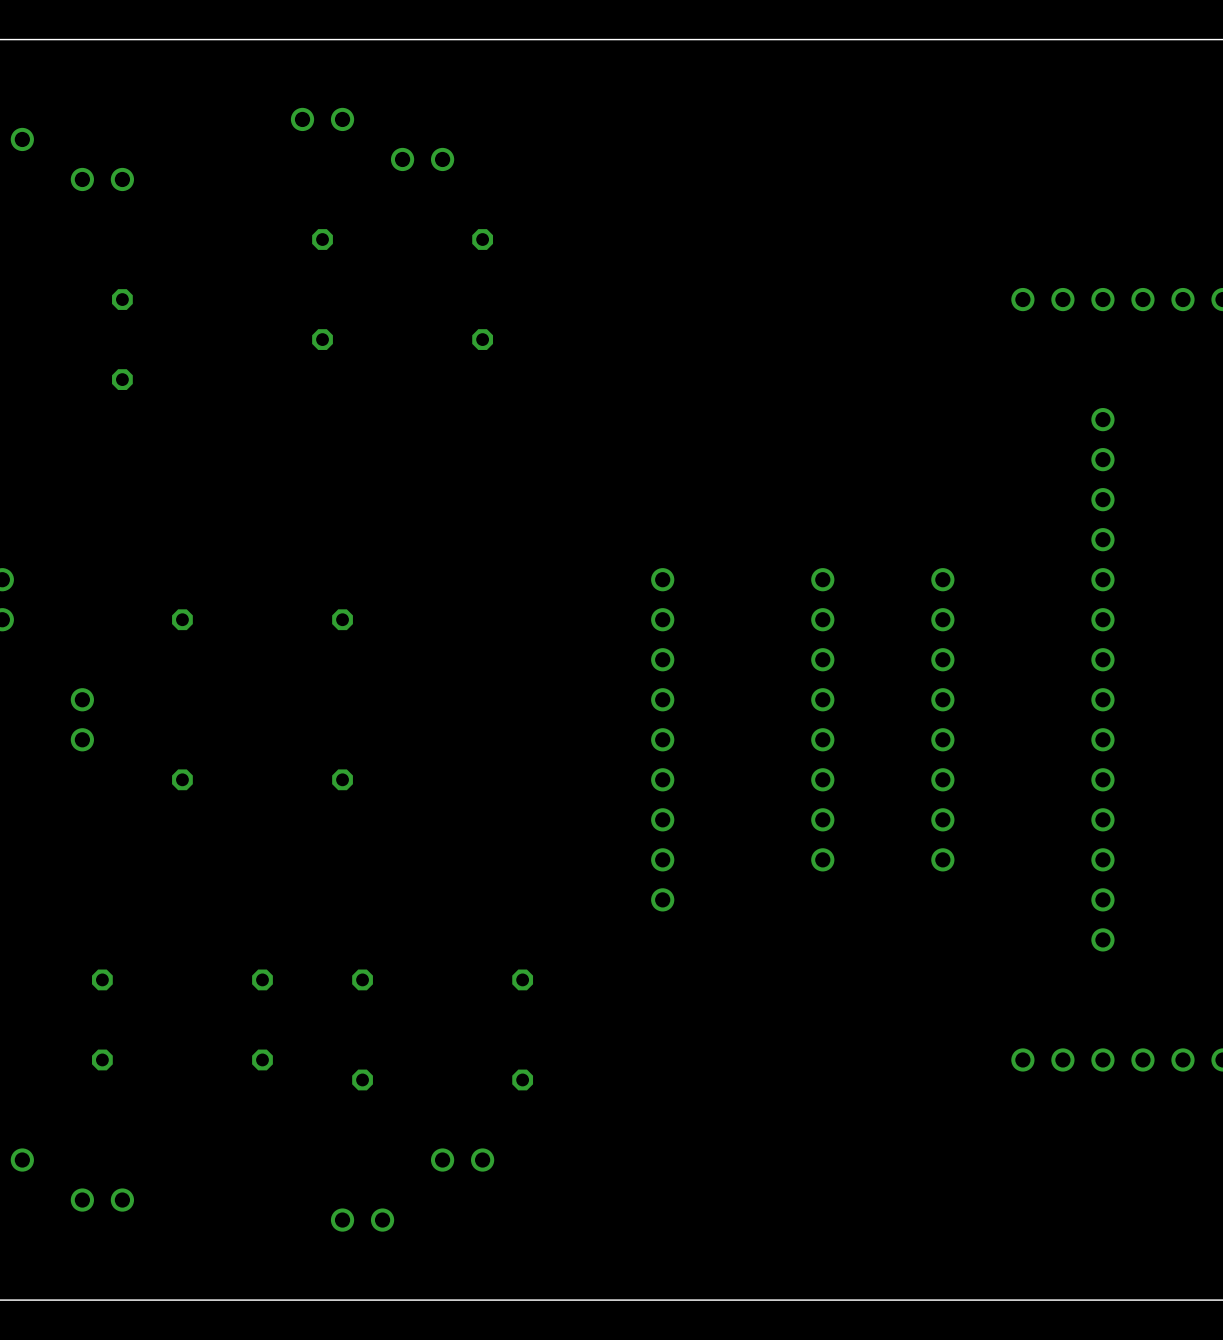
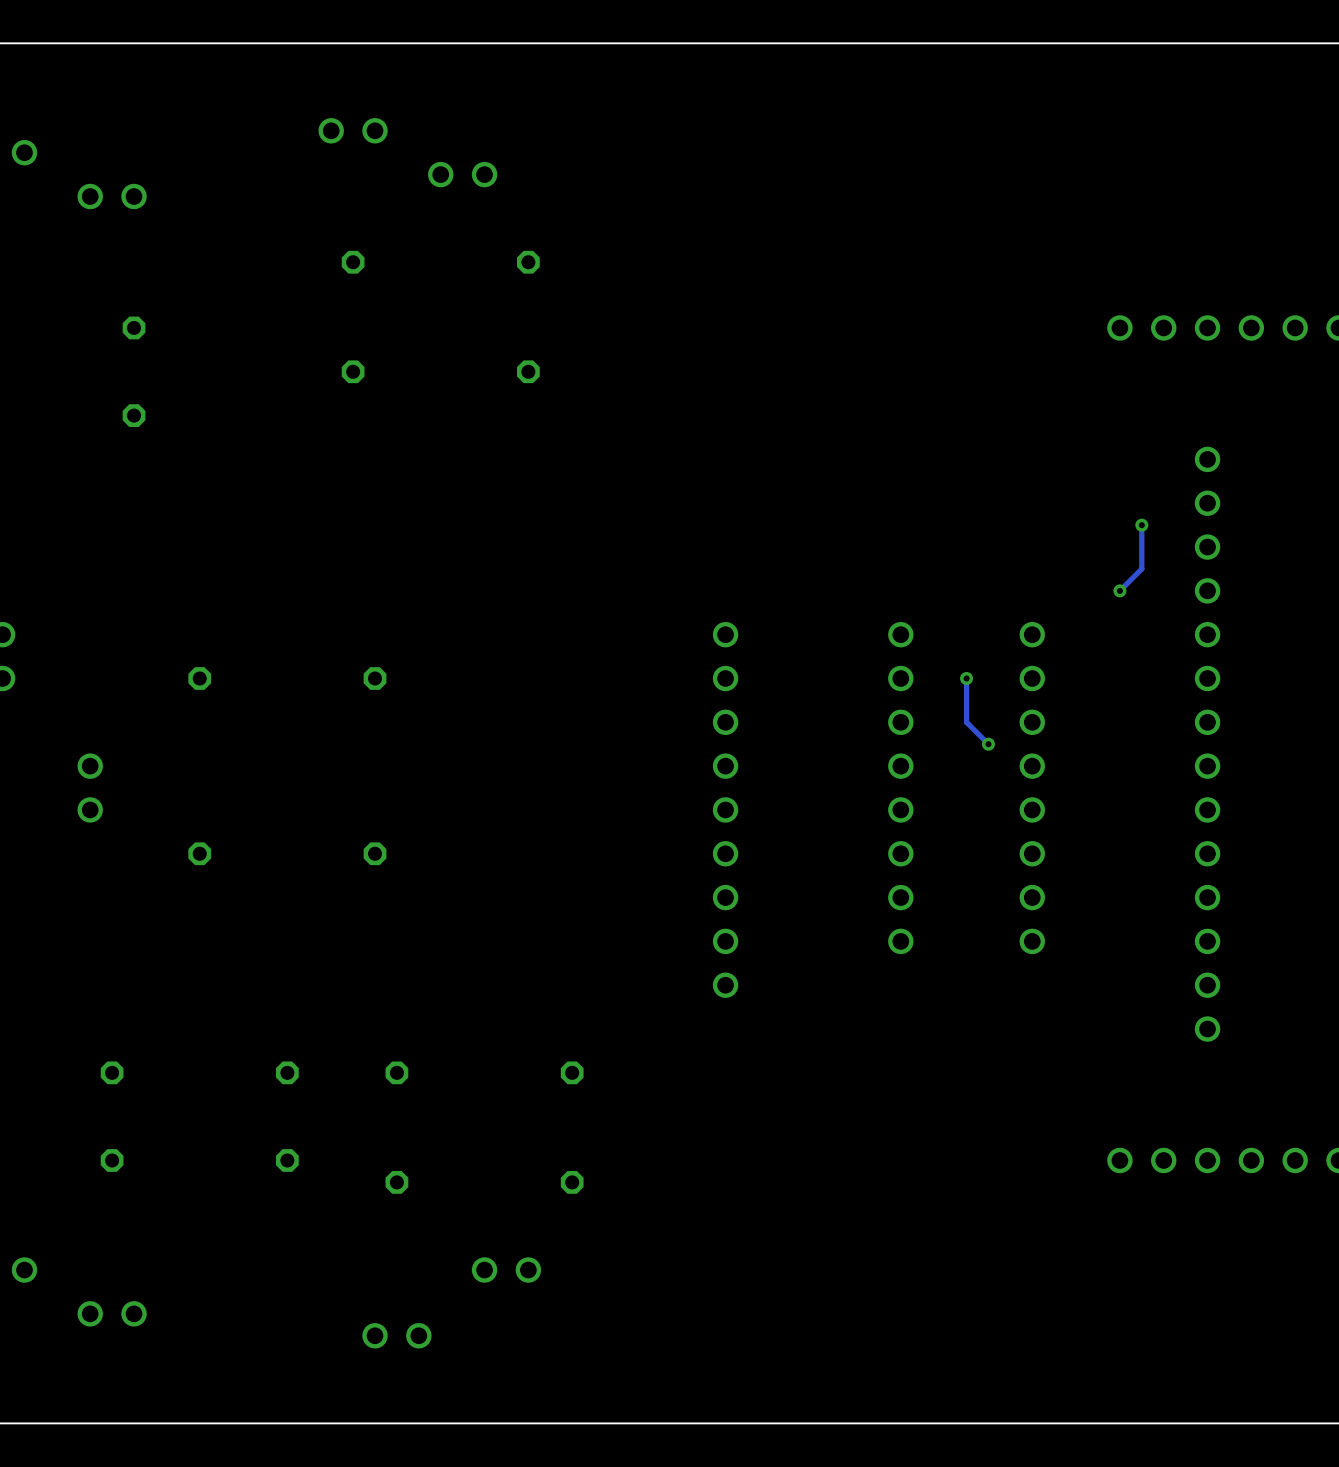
track: none -> (1141, 525) (1141, 568) (1119, 590)
via: none -> (1141, 525)
via: none -> (1119, 590)
track: none -> (966, 678) (966, 722) (988, 744)
via: none -> (966, 678)
via: none -> (988, 744)

